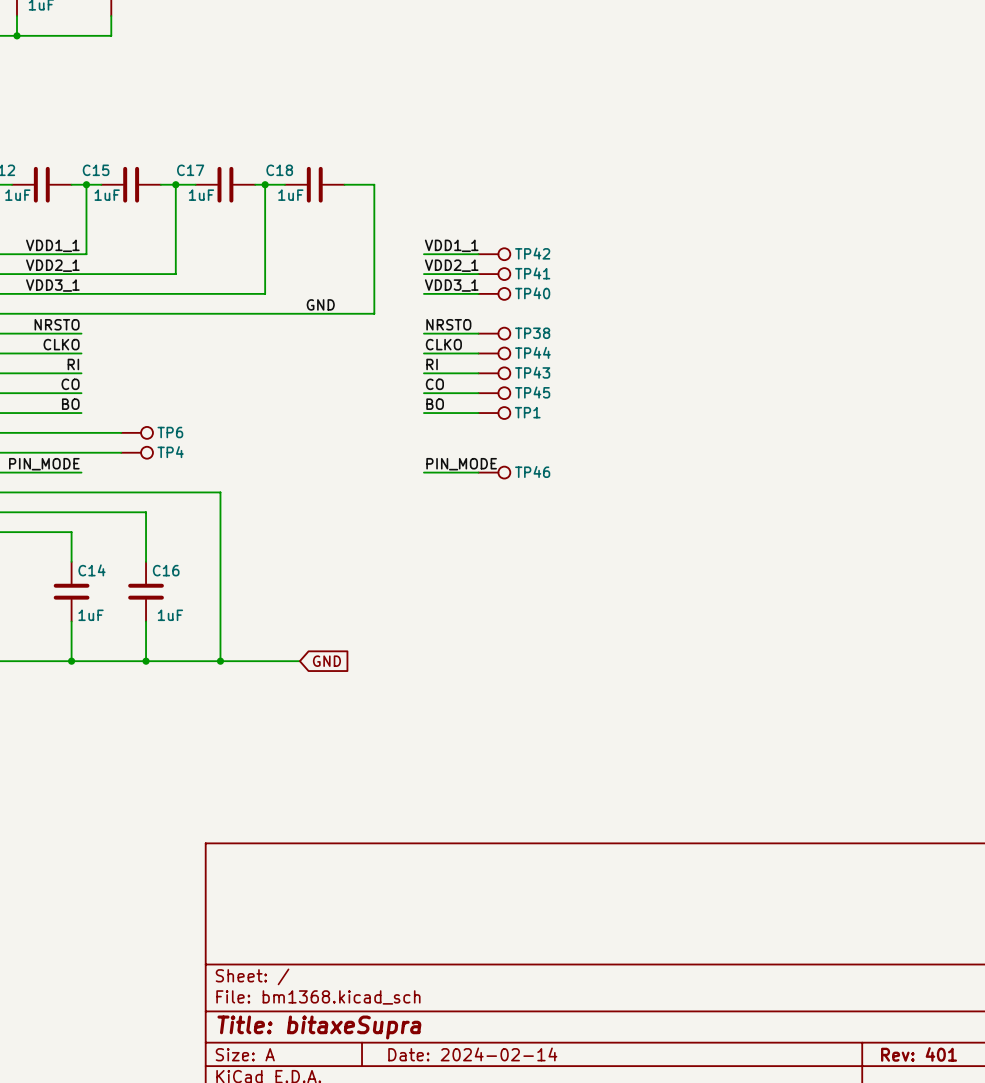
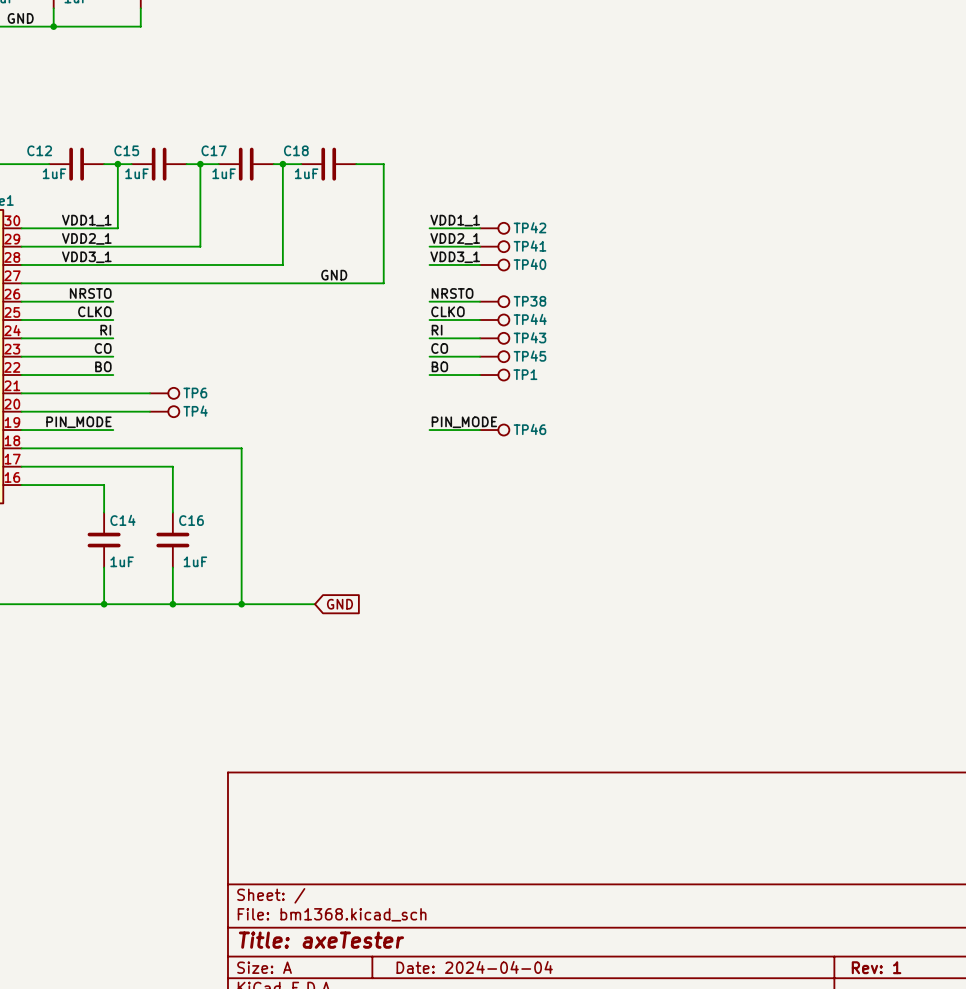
title block: Title: bitaxeSupra (319, 1027) -> Title: axeTester (321, 940)
title block: Date: 2024-02-14 (472, 1054) -> Date: 2024-04-04 (474, 967)
title block: Rev: 401 (919, 1054) -> Rev: 1 (876, 967)

